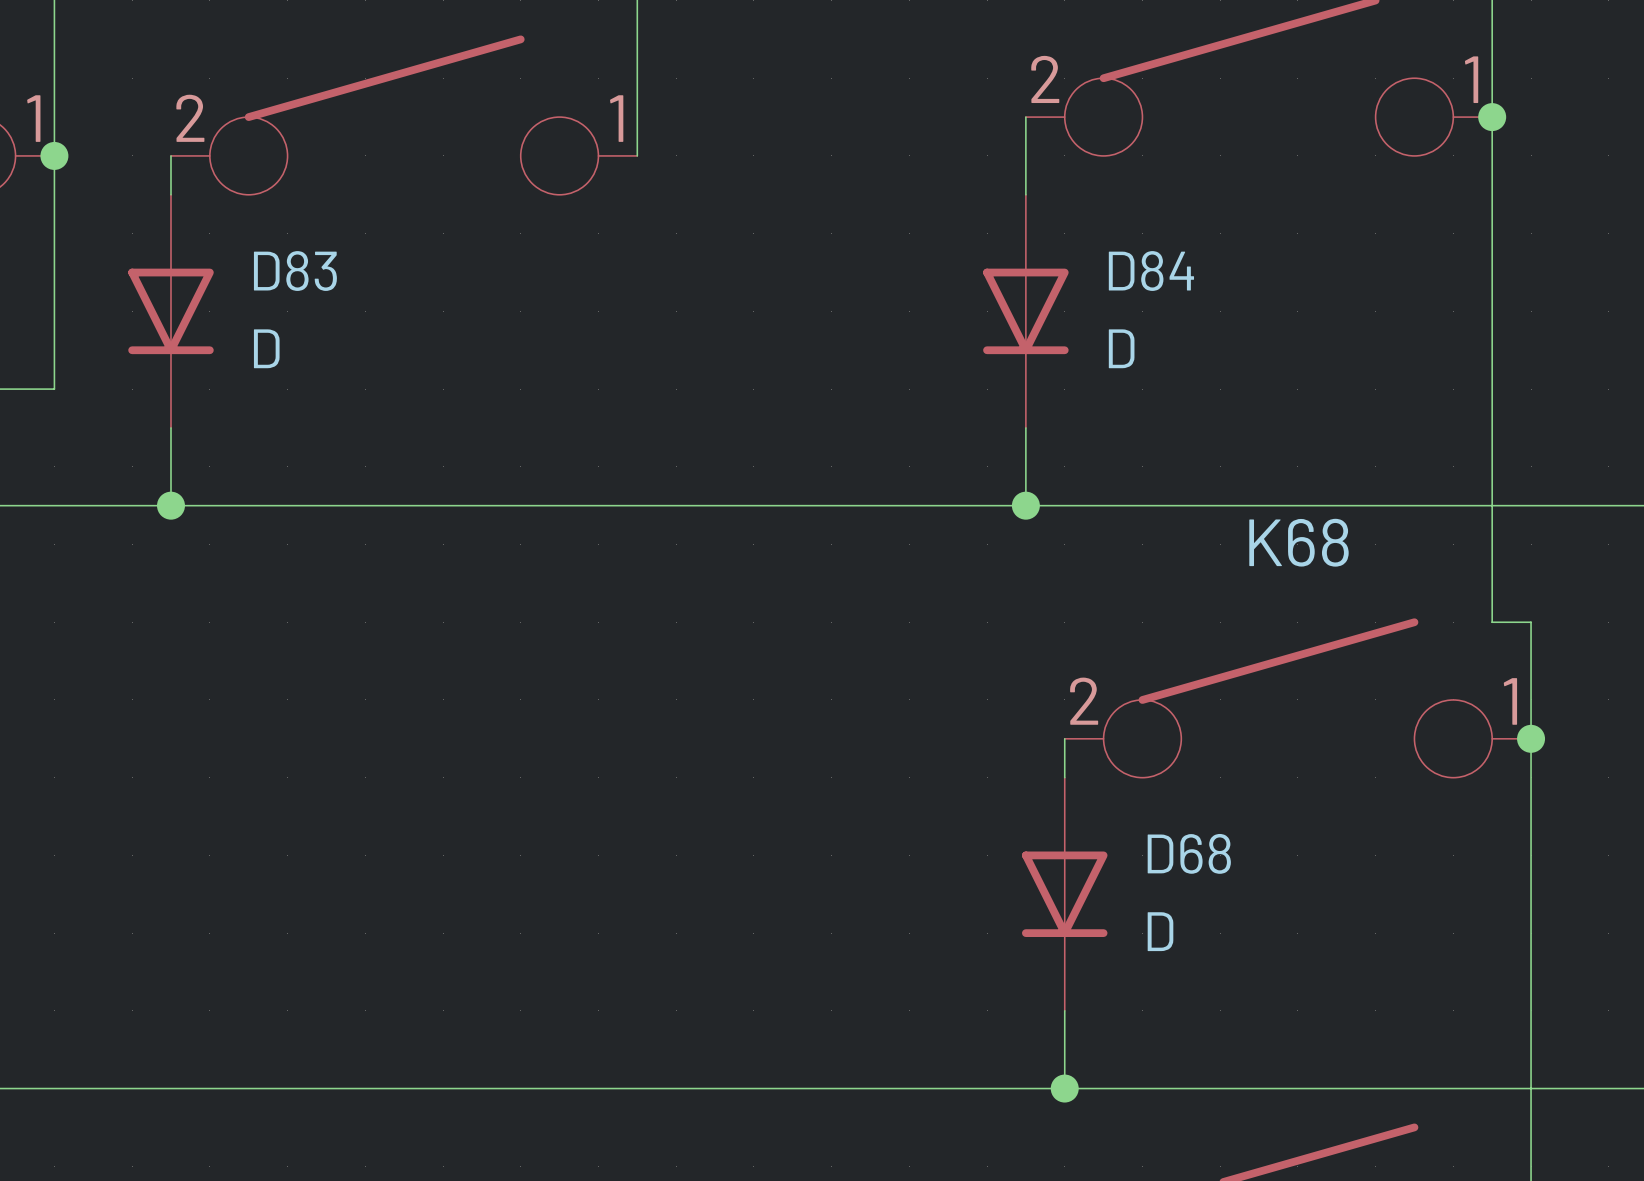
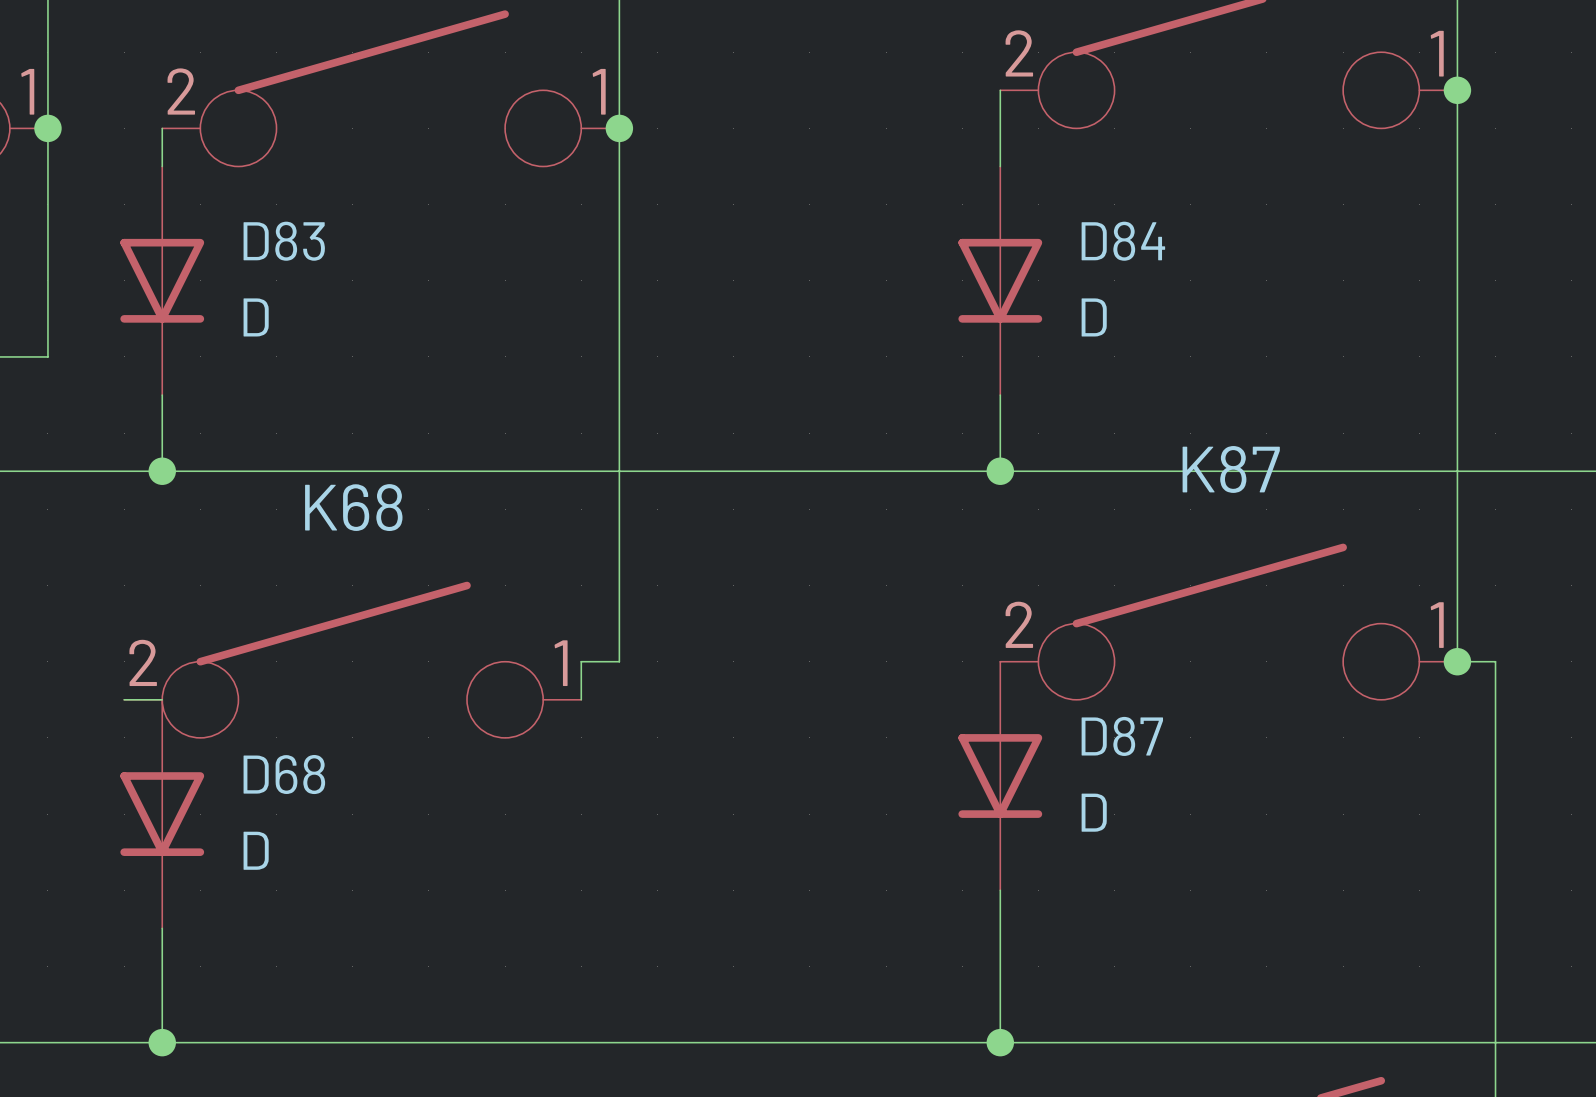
wire: none -> (619, 128) (619, 661) (581, 661) (581, 699)
junction: none -> (619, 128)
wire: (1492, 622) (1531, 622) (1531, 699) -> (1457, 585) (1457, 661) (1495, 661)
K87: none -> (1228, 621)
K68 position: (1297, 698) -> (352, 659)
wire: none -> (124, 699) (162, 699)
wire: (1064, 738) (1064, 777) -> none
junction position: (1531, 738) -> (1457, 661)
D87: none -> D (1000, 775)
D68 position: (1064, 894) -> (162, 814)
wire: none -> (1000, 890) (1000, 1042)
wire: none -> (162, 928) (162, 1042)
wire: (1064, 1010) (1064, 1088) -> none
junction: none -> (162, 1042)
junction position: (1064, 1088) -> (1000, 1042)

